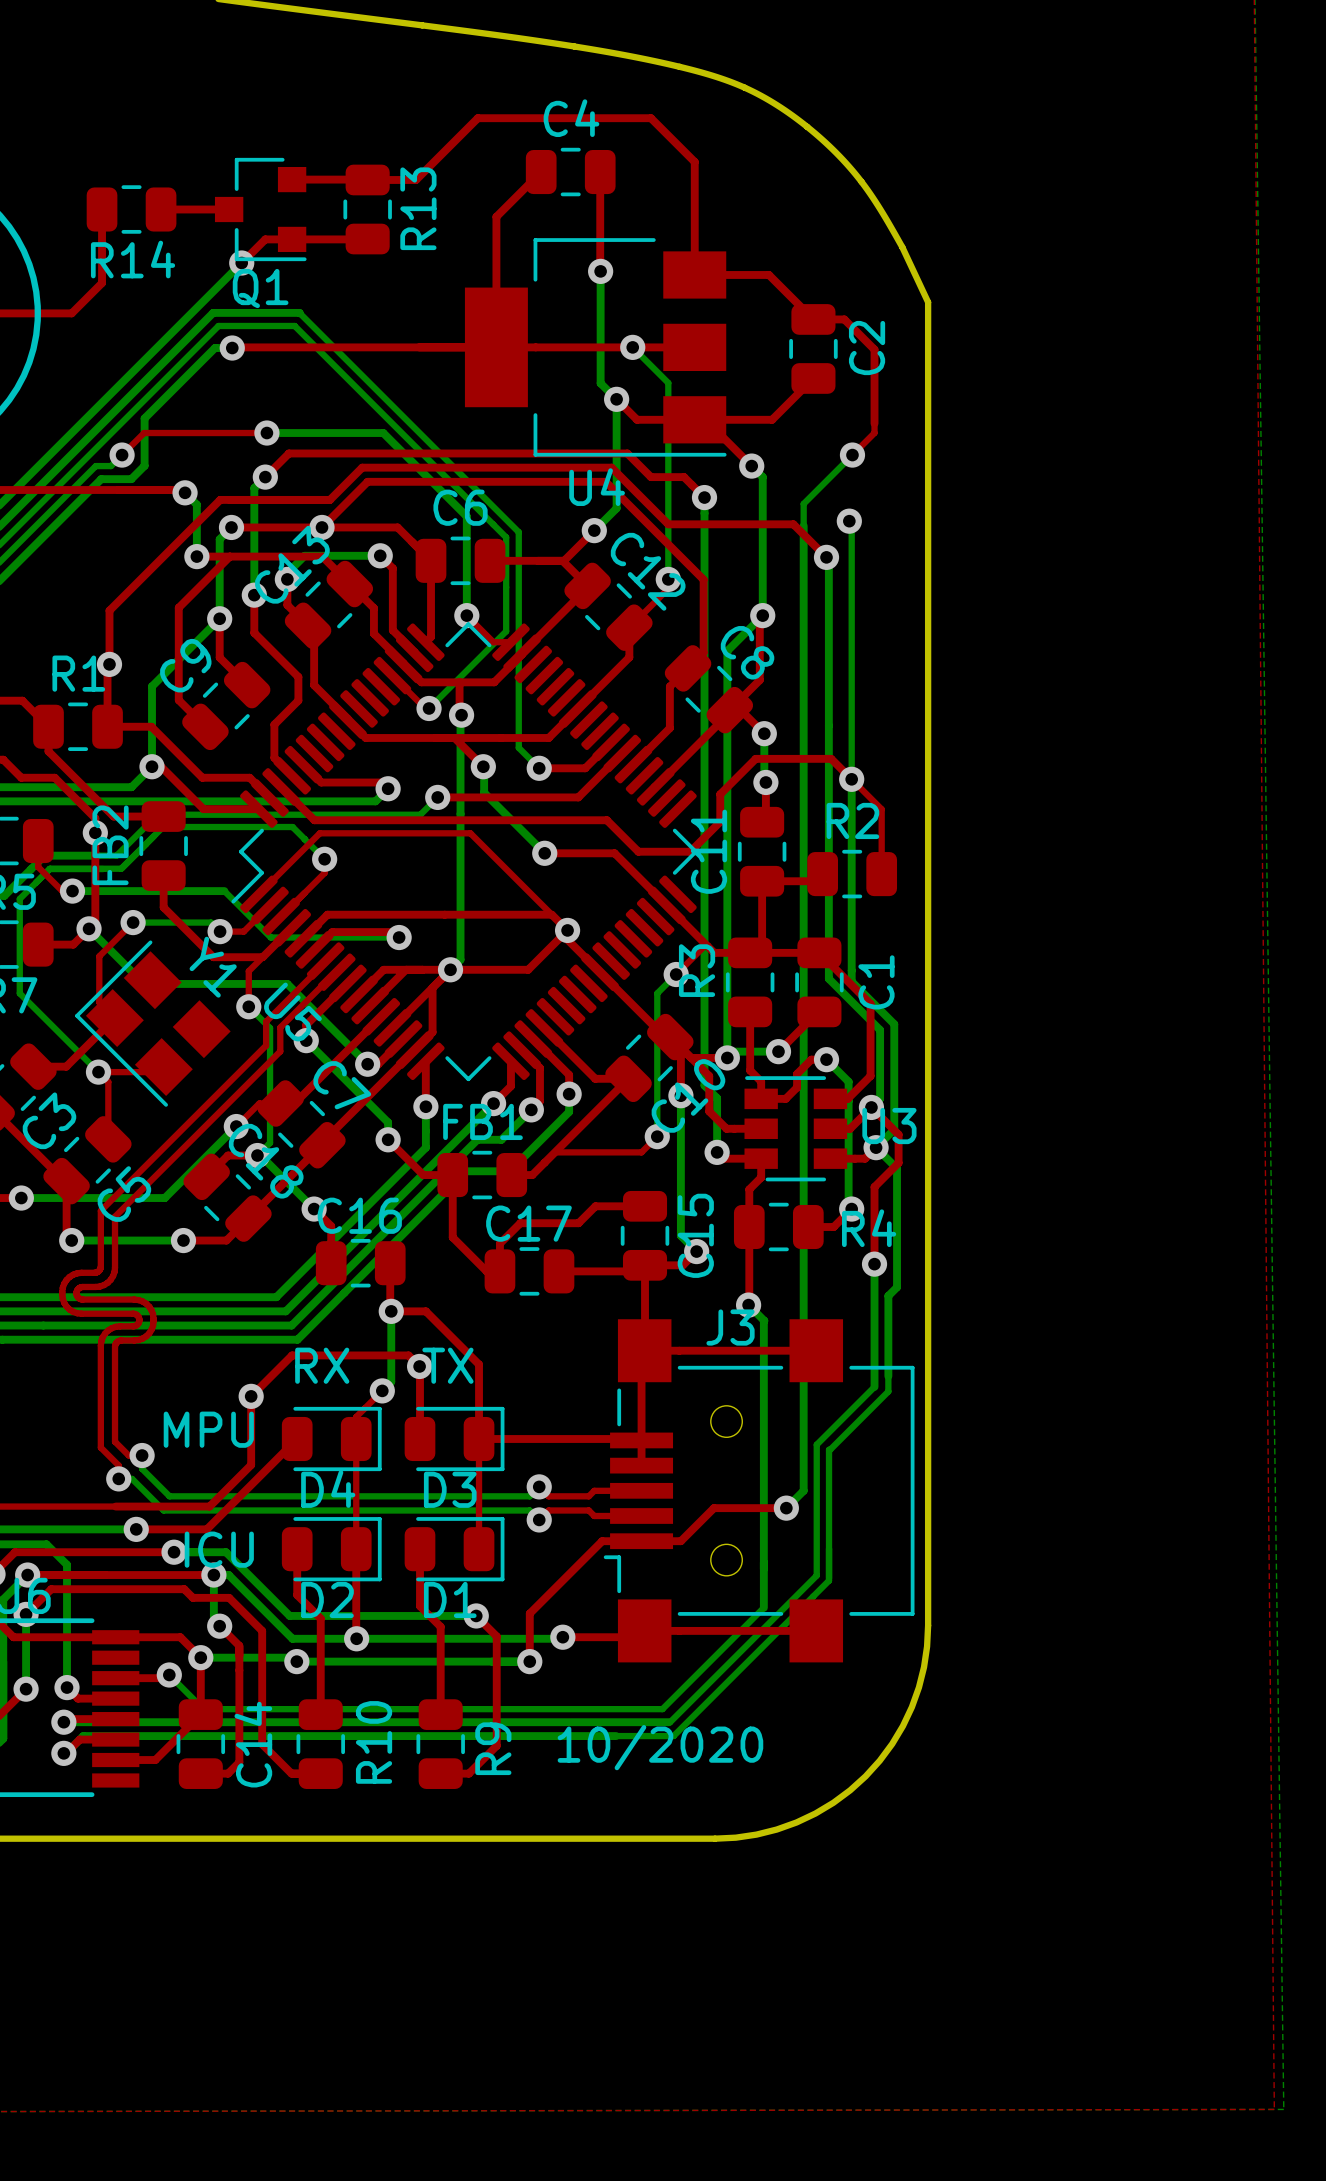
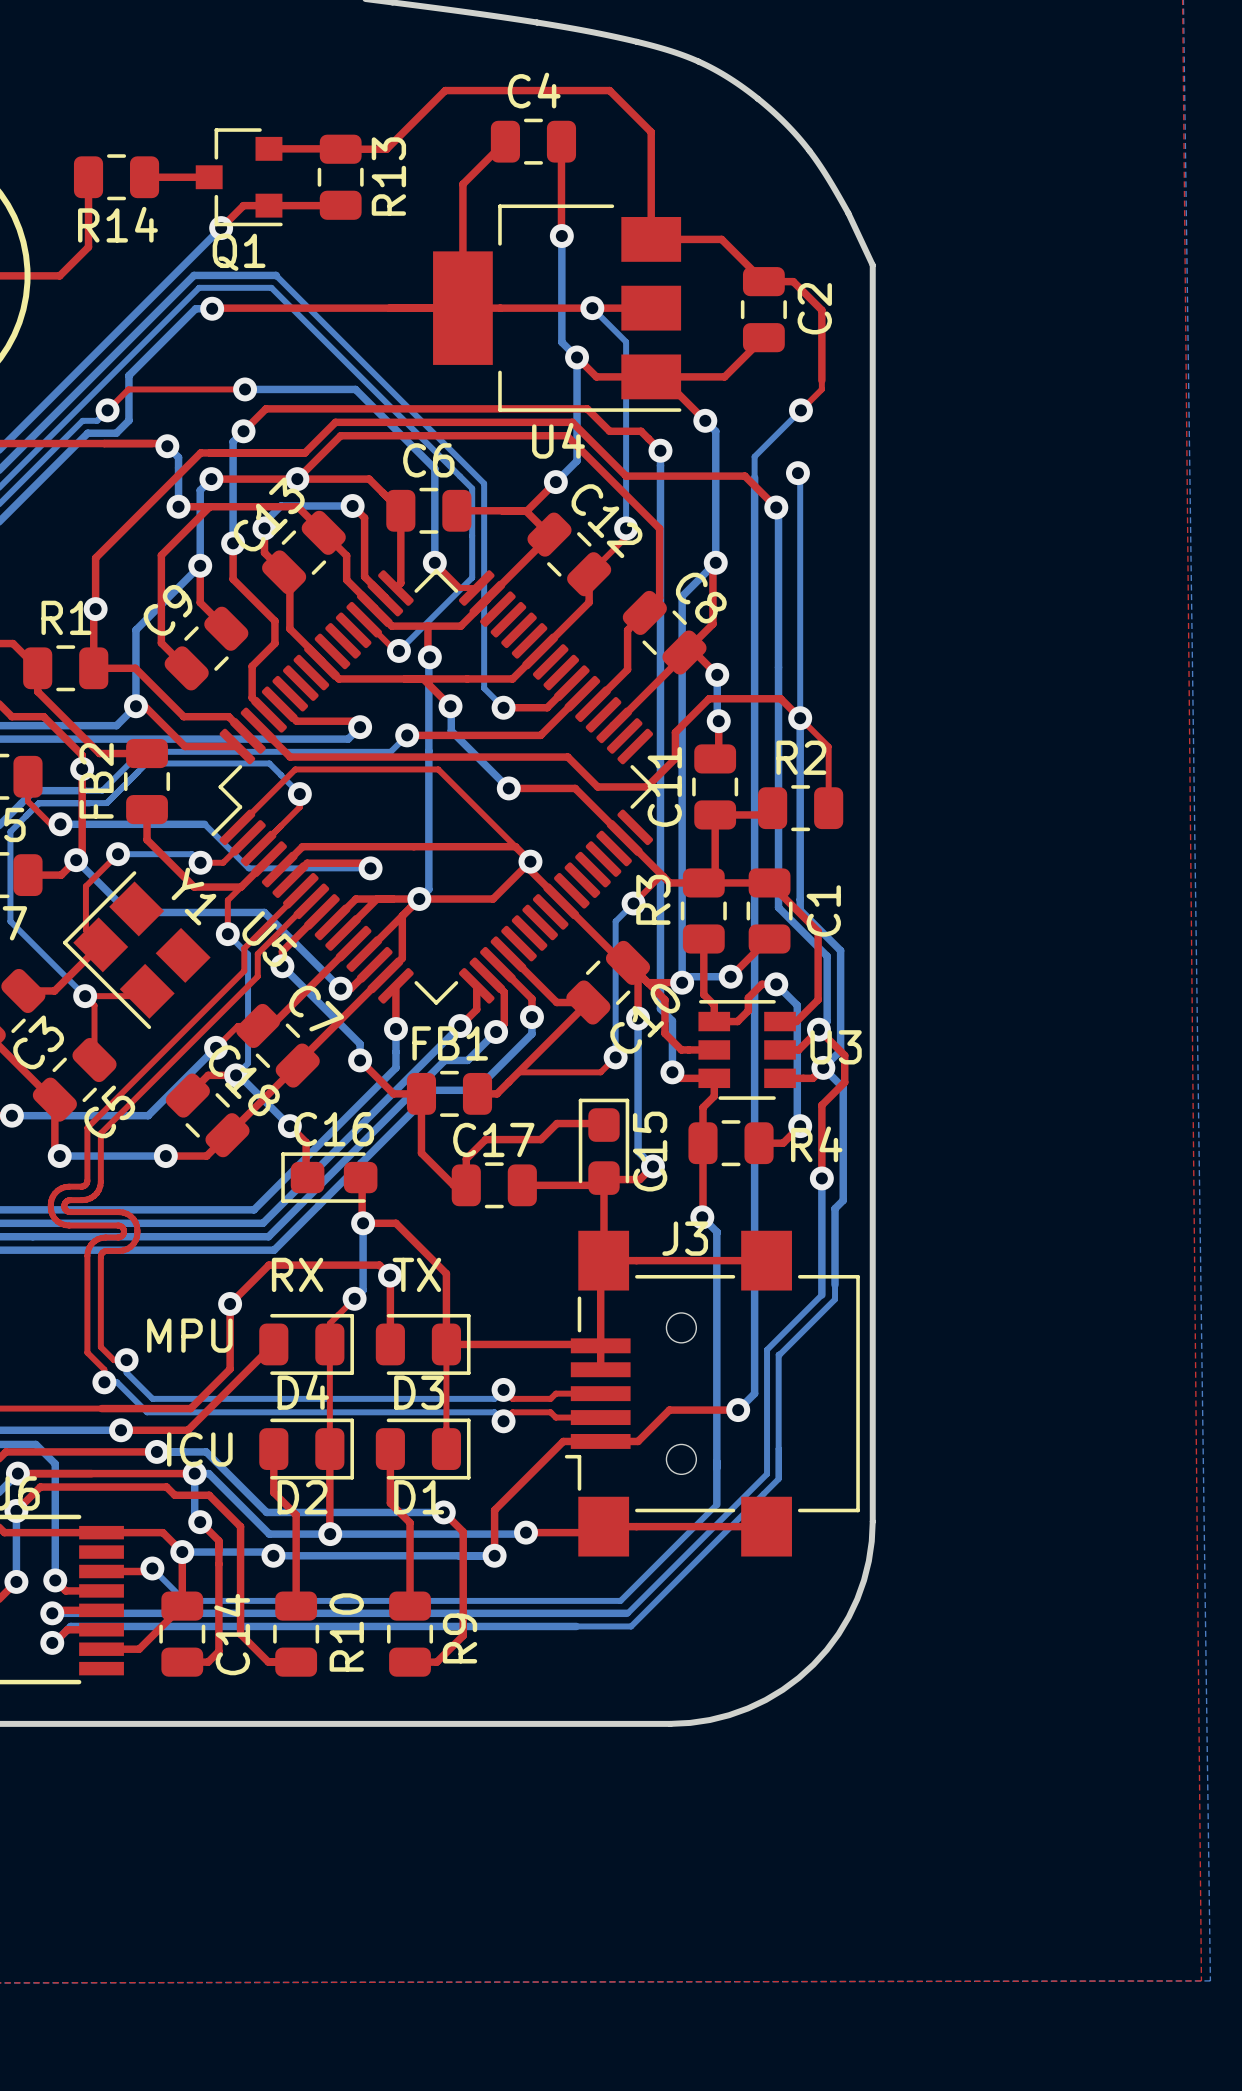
C15 footprint: [620, 1190, 670, 1281] -> [578, 1098, 630, 1195]
C16 footprint: [315, 1238, 406, 1288] -> [281, 1152, 378, 1203]
text: 10/2020 (660, 1747) -> none

